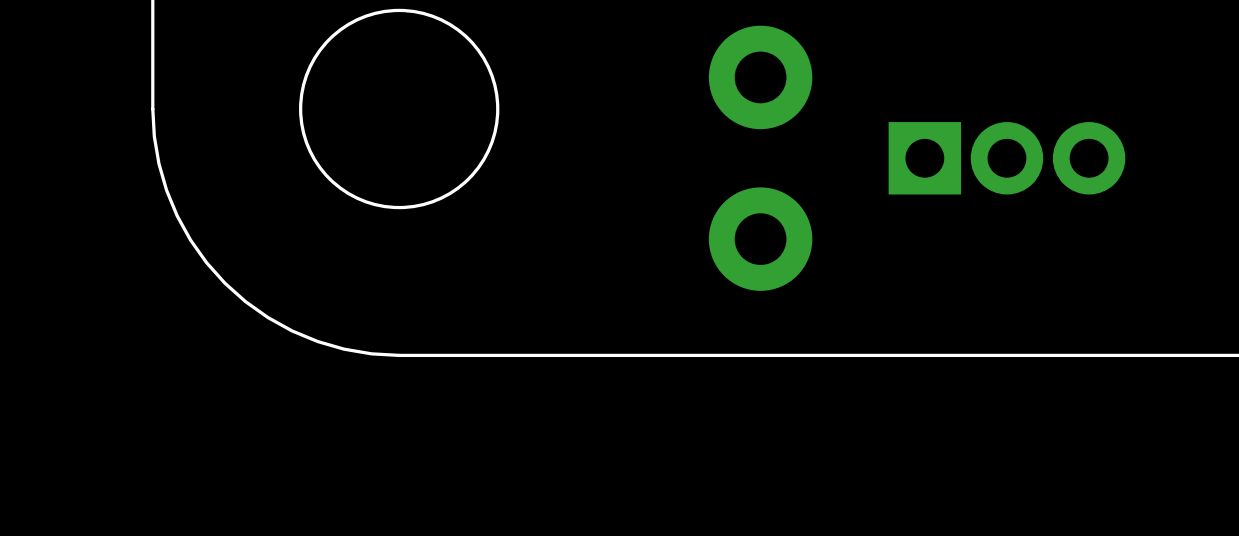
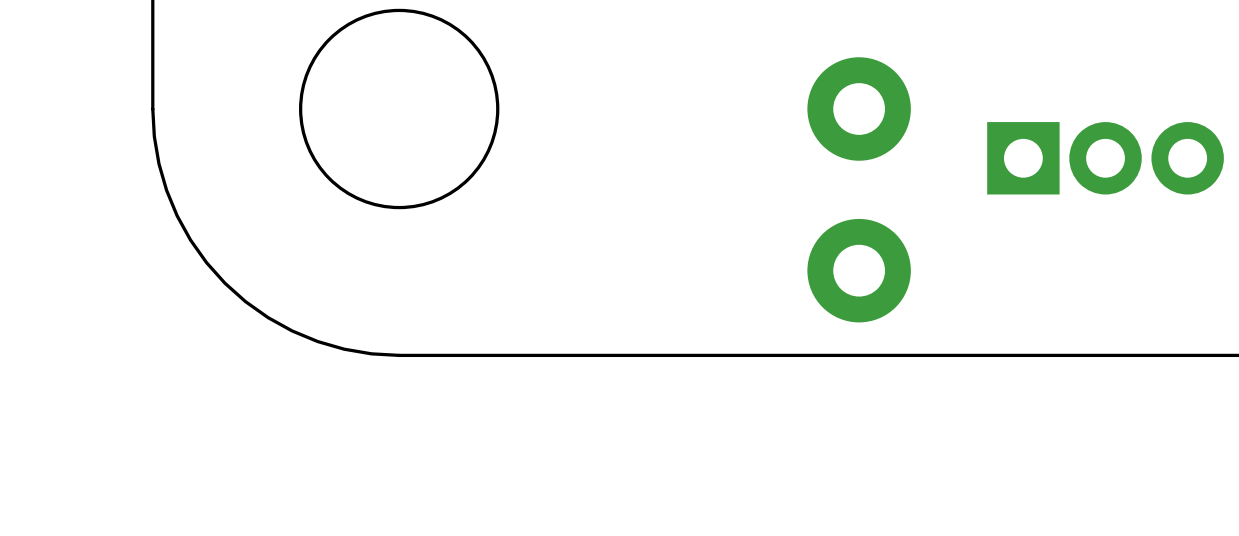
part position: (760, 158) -> (859, 189)
part position: (1006, 158) -> (1105, 158)

